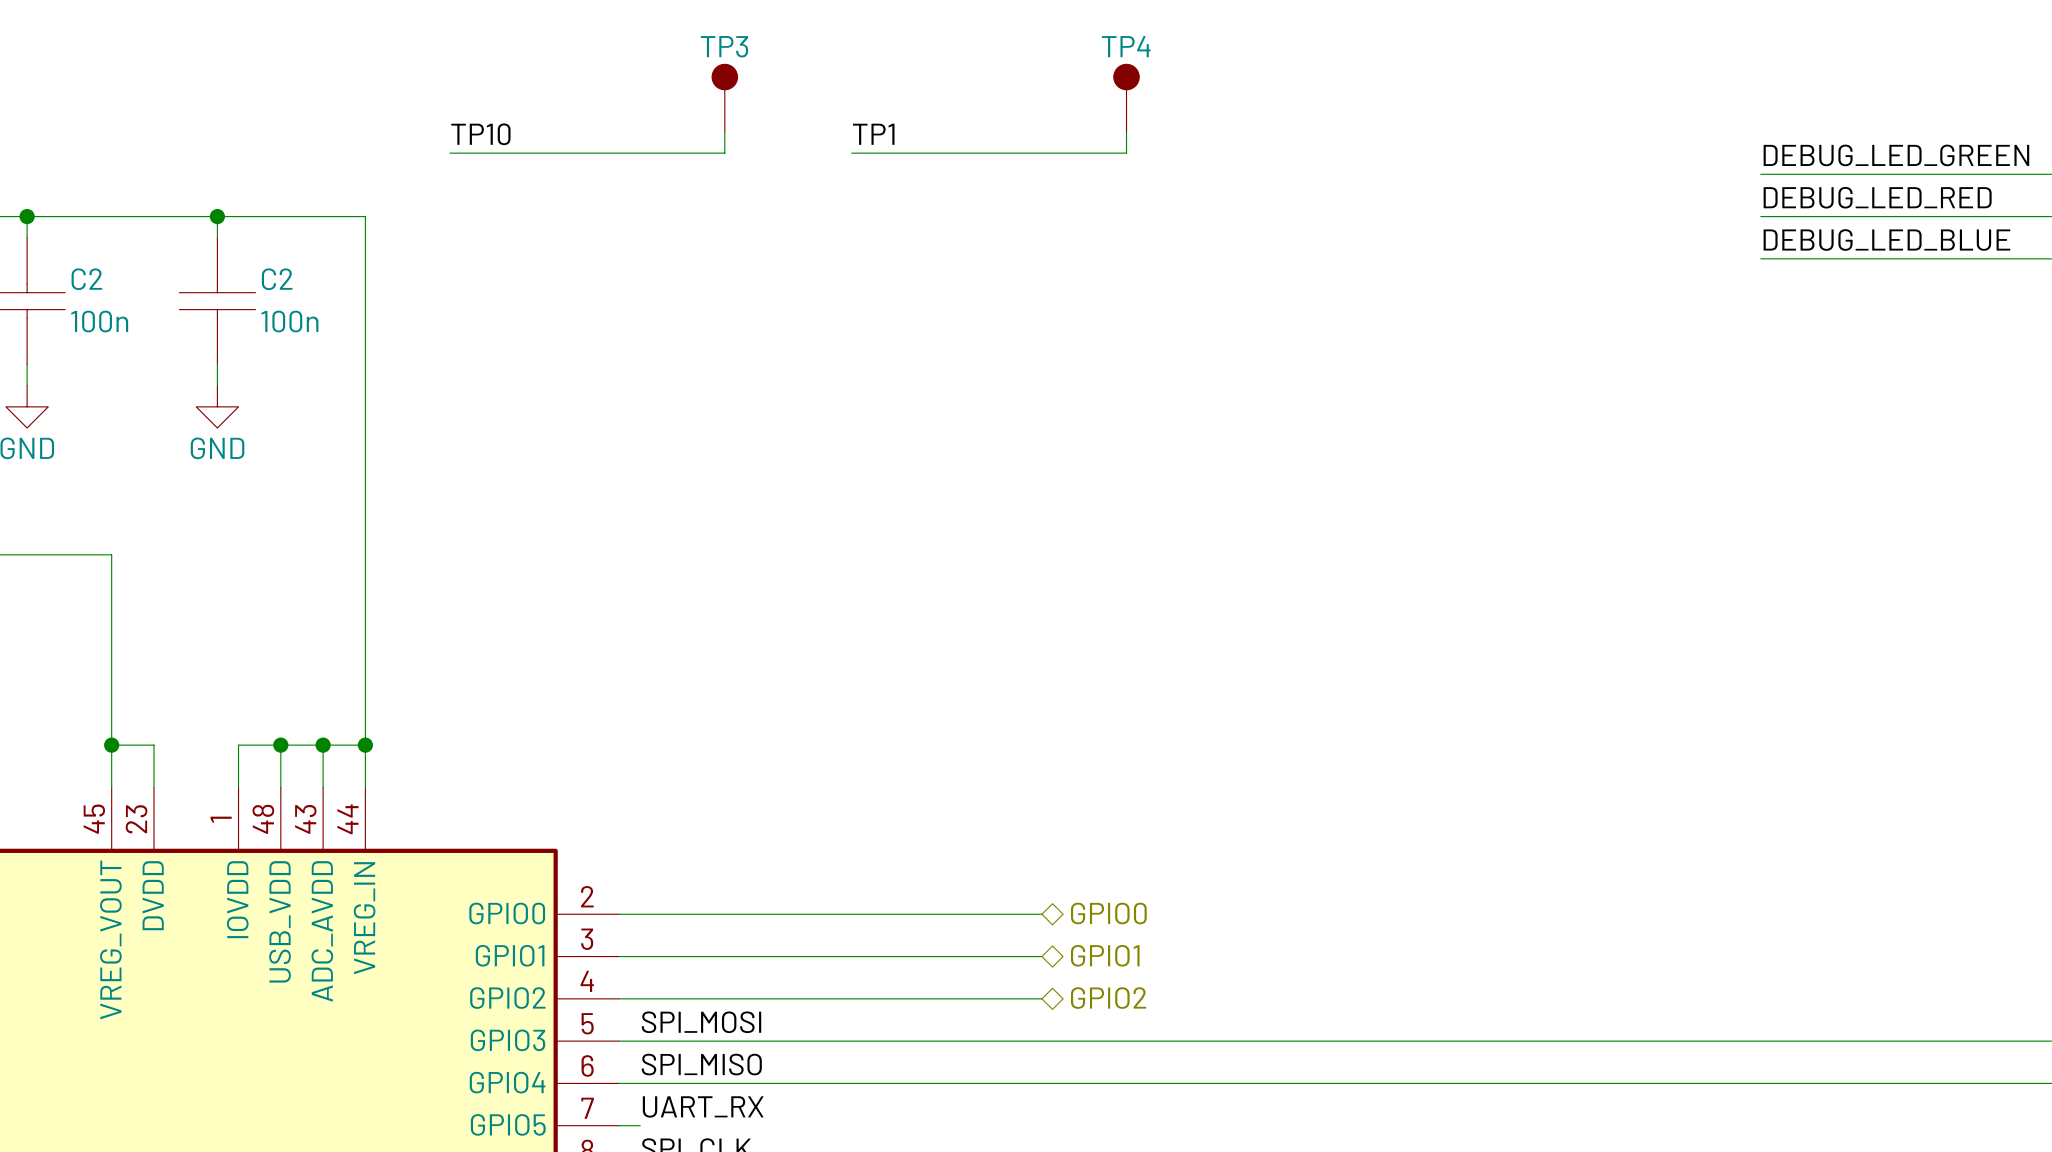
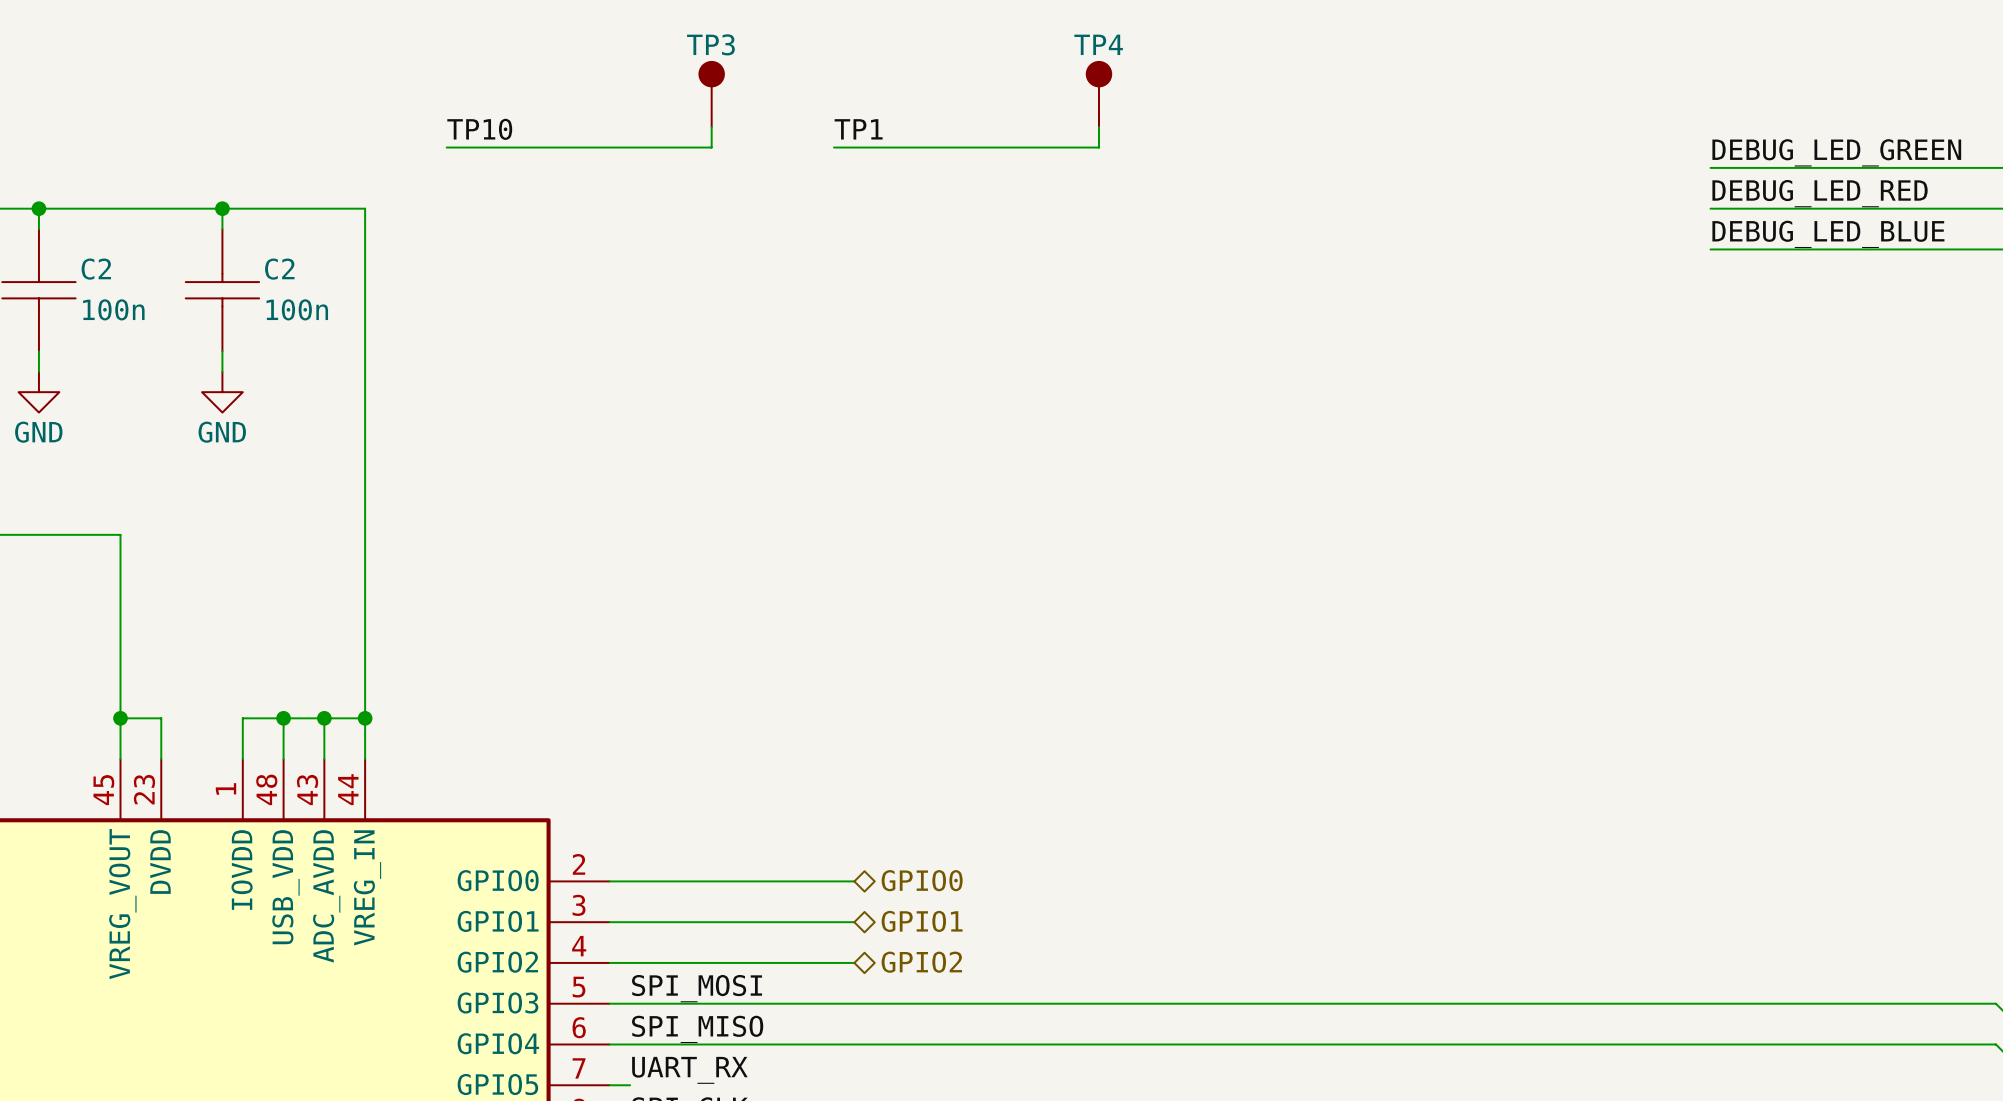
hierarchical label position: GPIO0 (1108, 913) -> GPIO0 (922, 880)
wire: (872, 914) (1041, 914) -> none
hierarchical label position: GPIO1 (1105, 955) -> GPIO1 (922, 921)
wire: (872, 956) (1041, 956) -> none
wire: (872, 998) (1041, 998) -> none
hierarchical label position: GPIO2 (1108, 998) -> GPIO2 (921, 962)

